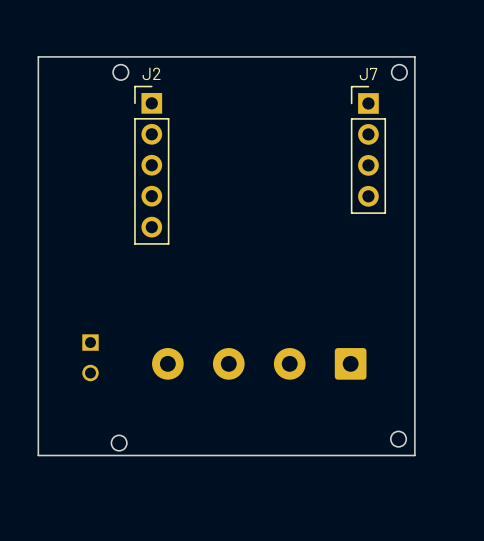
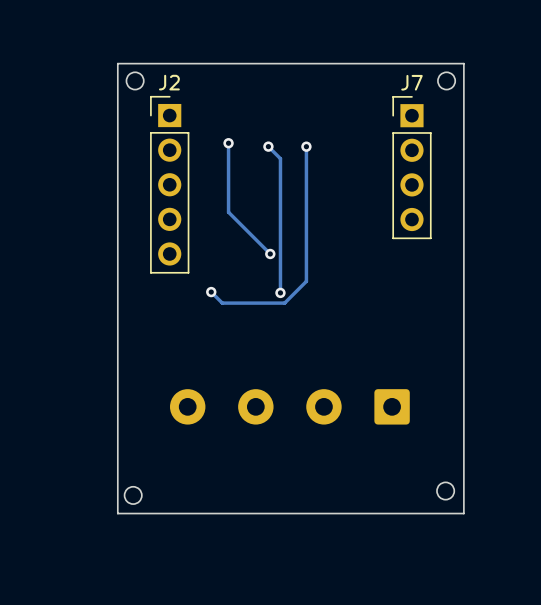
board edge: (105, 56) (38, 56) (38, 455) (414, 455) -> (117, 63) (117, 513) (463, 513) (463, 509)
track: none -> (228, 143) (228, 212) (270, 253)
via: none -> (228, 143)
track: none -> (268, 146) (280, 158) (280, 292)
via: none -> (268, 146)
track: none -> (306, 146) (306, 281) (284, 303) (222, 303) (211, 292)
via: none -> (306, 146)
via: none -> (270, 253)
via: none -> (211, 292)
via: none -> (280, 292)
part: (90, 357) -> none

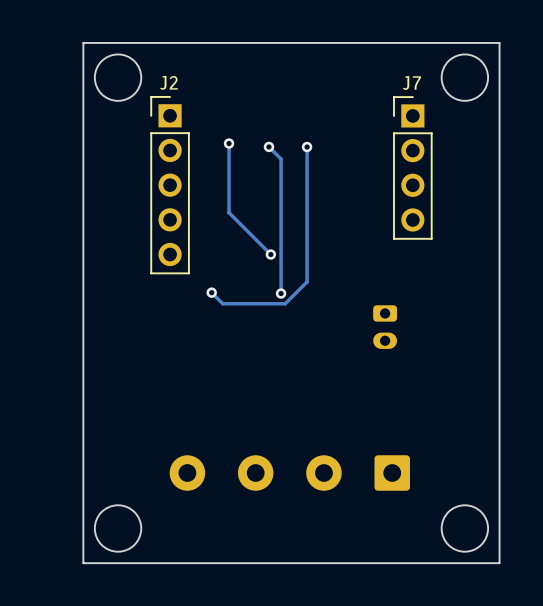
round board edge: none -> [94, 54, 142, 102]
round board edge: none -> [441, 54, 489, 102]
board edge: (463, 63) (117, 63) (117, 513) (463, 513) (463, 63) -> (499, 42) (499, 563) (83, 563) (83, 42) (499, 42)
round board edge: [126, 71, 145, 90] -> none
round board edge: [437, 71, 456, 90] -> none
part: none -> (385, 327)
part position: (289, 406) -> (289, 473)
round board edge: [436, 482, 455, 501] -> none
round board edge: [124, 486, 143, 505] -> none
round board edge: none -> [94, 504, 142, 553]
round board edge: none -> [441, 504, 489, 553]

